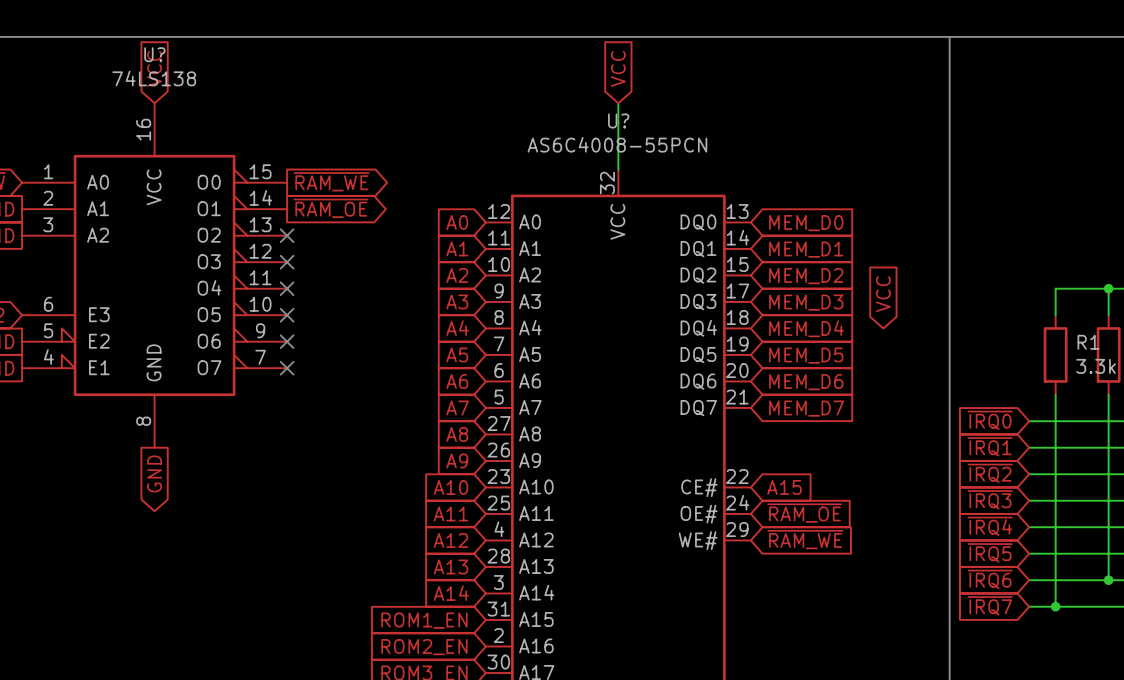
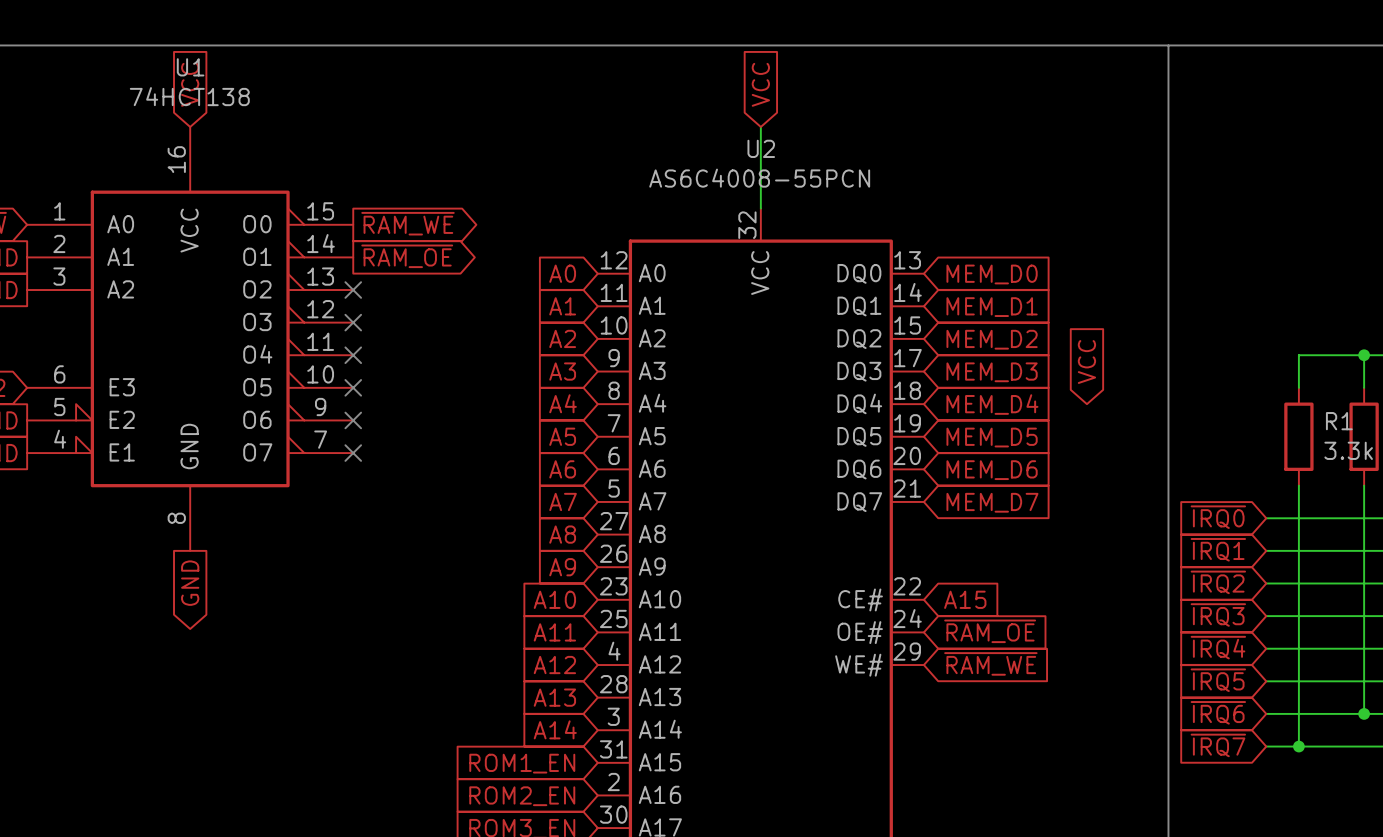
U? name: U? (154, 54) -> U1 (190, 67)
U? value: 74LS138 (154, 78) -> 74HCT138 (189, 96)
U? name: U? (618, 120) -> U2 (761, 148)

